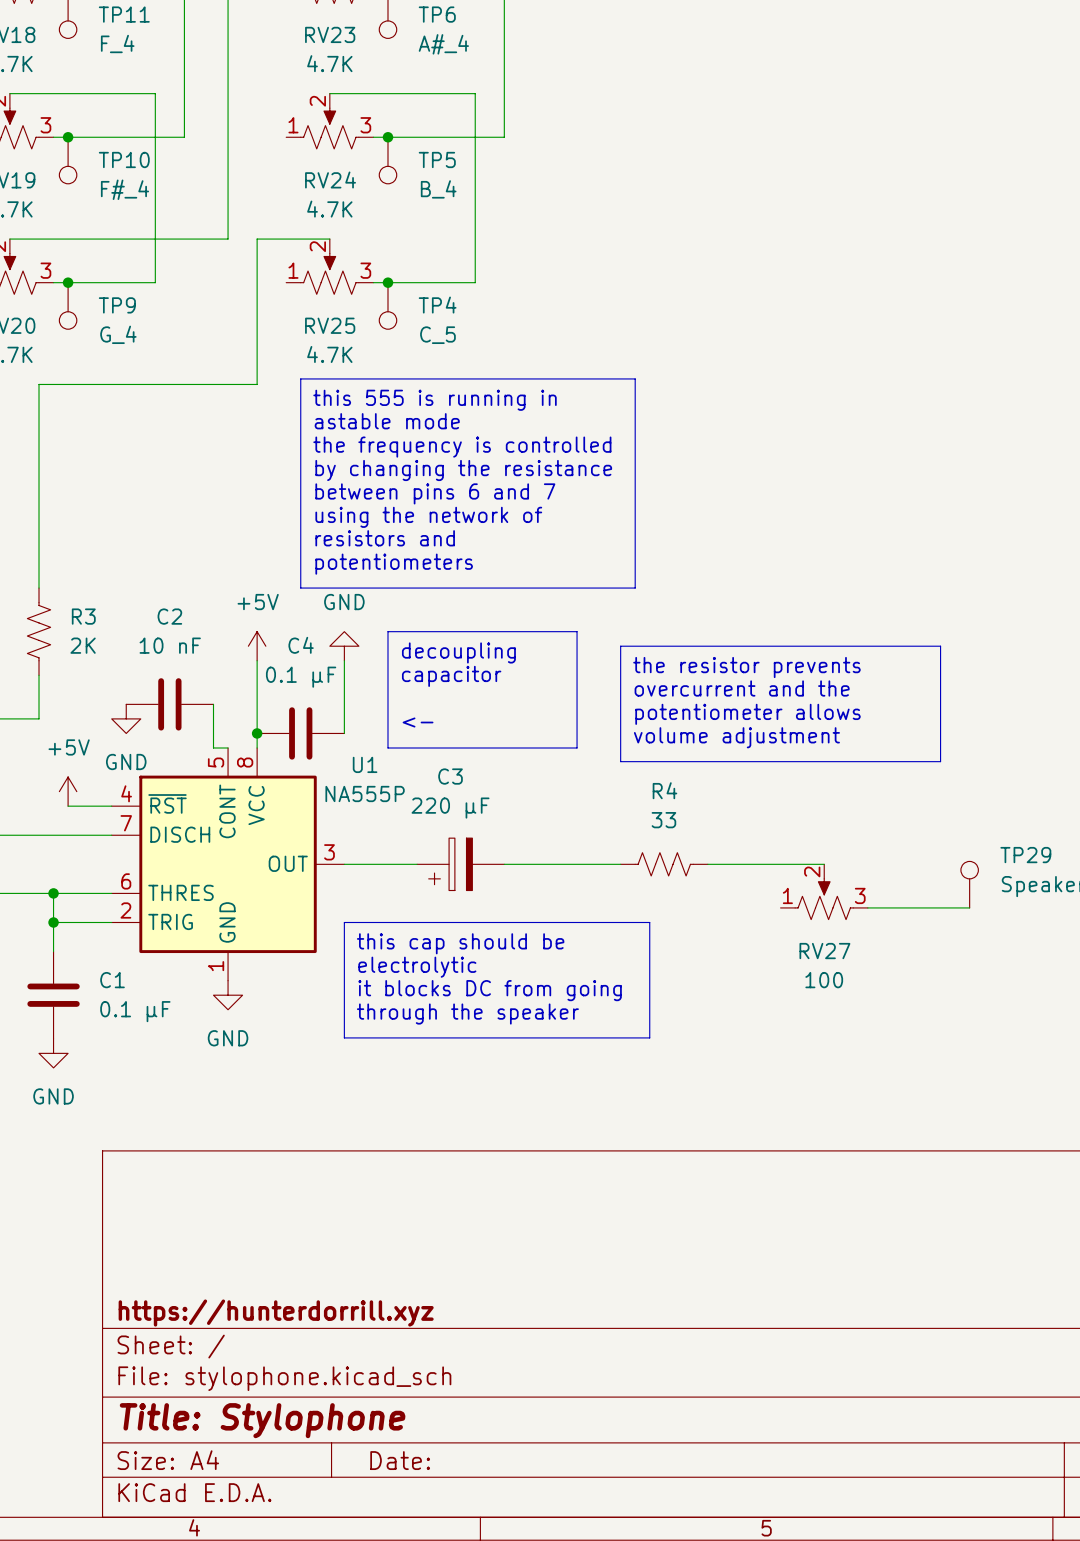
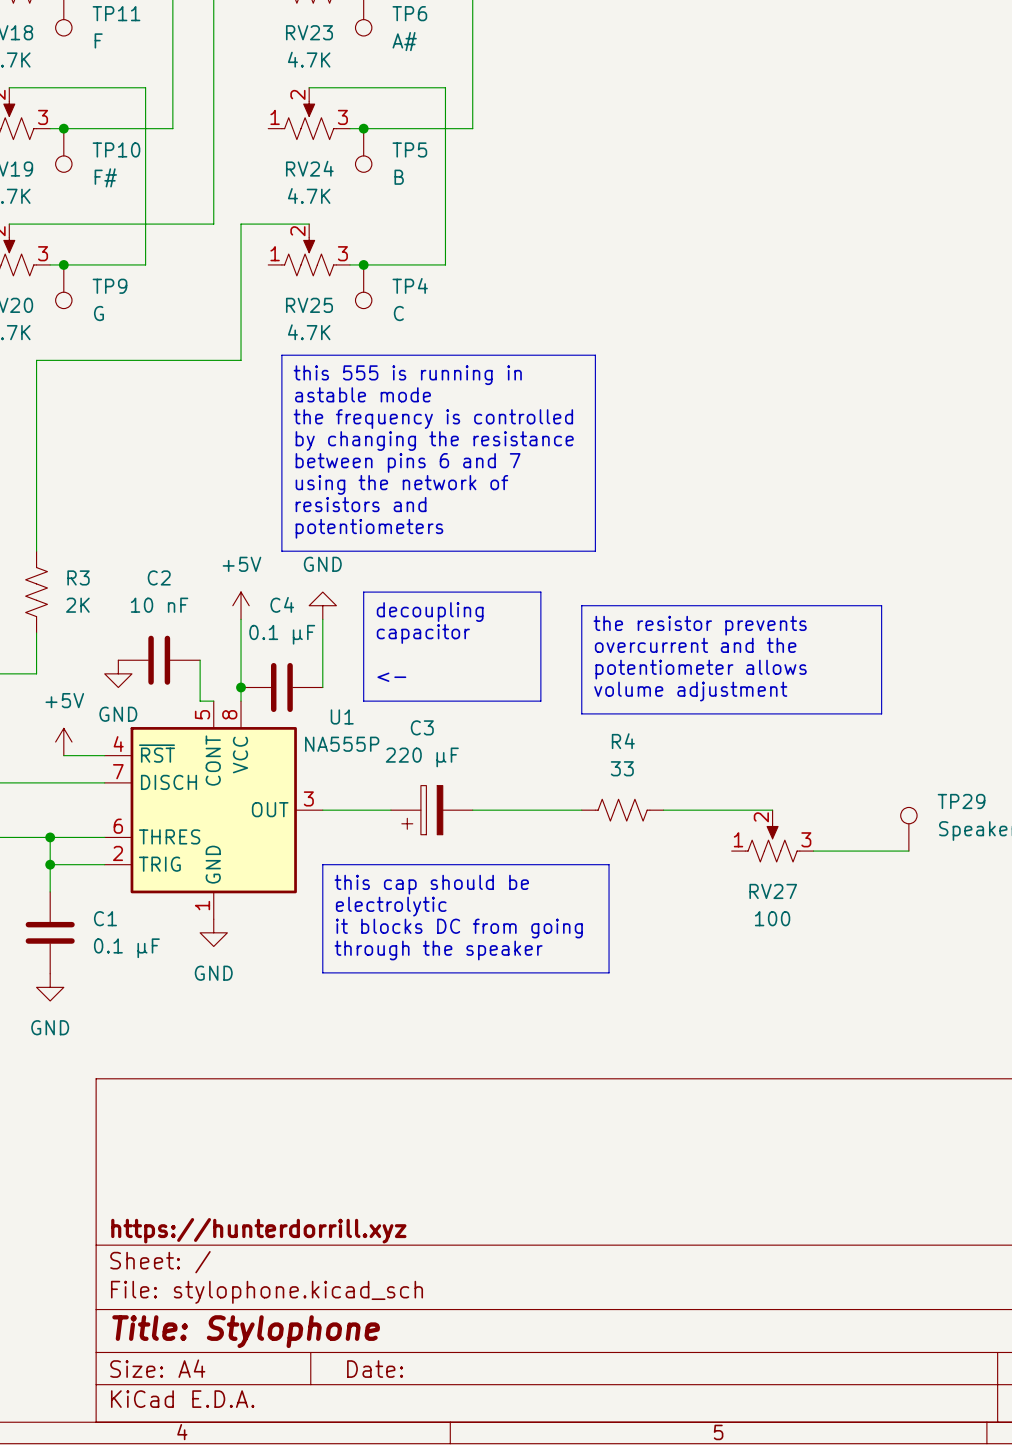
TP11 value: F_4 (117, 44) -> F (98, 40)
TP6 value: A#_4 (443, 44) -> A# (404, 41)
TP10 value: F#_4 (124, 189) -> F# (105, 177)
TP5 value: B_4 (438, 189) -> B (399, 177)
TP9 value: G_4 (118, 334) -> G (98, 313)
TP4 value: C_5 (437, 335) -> C (398, 313)

